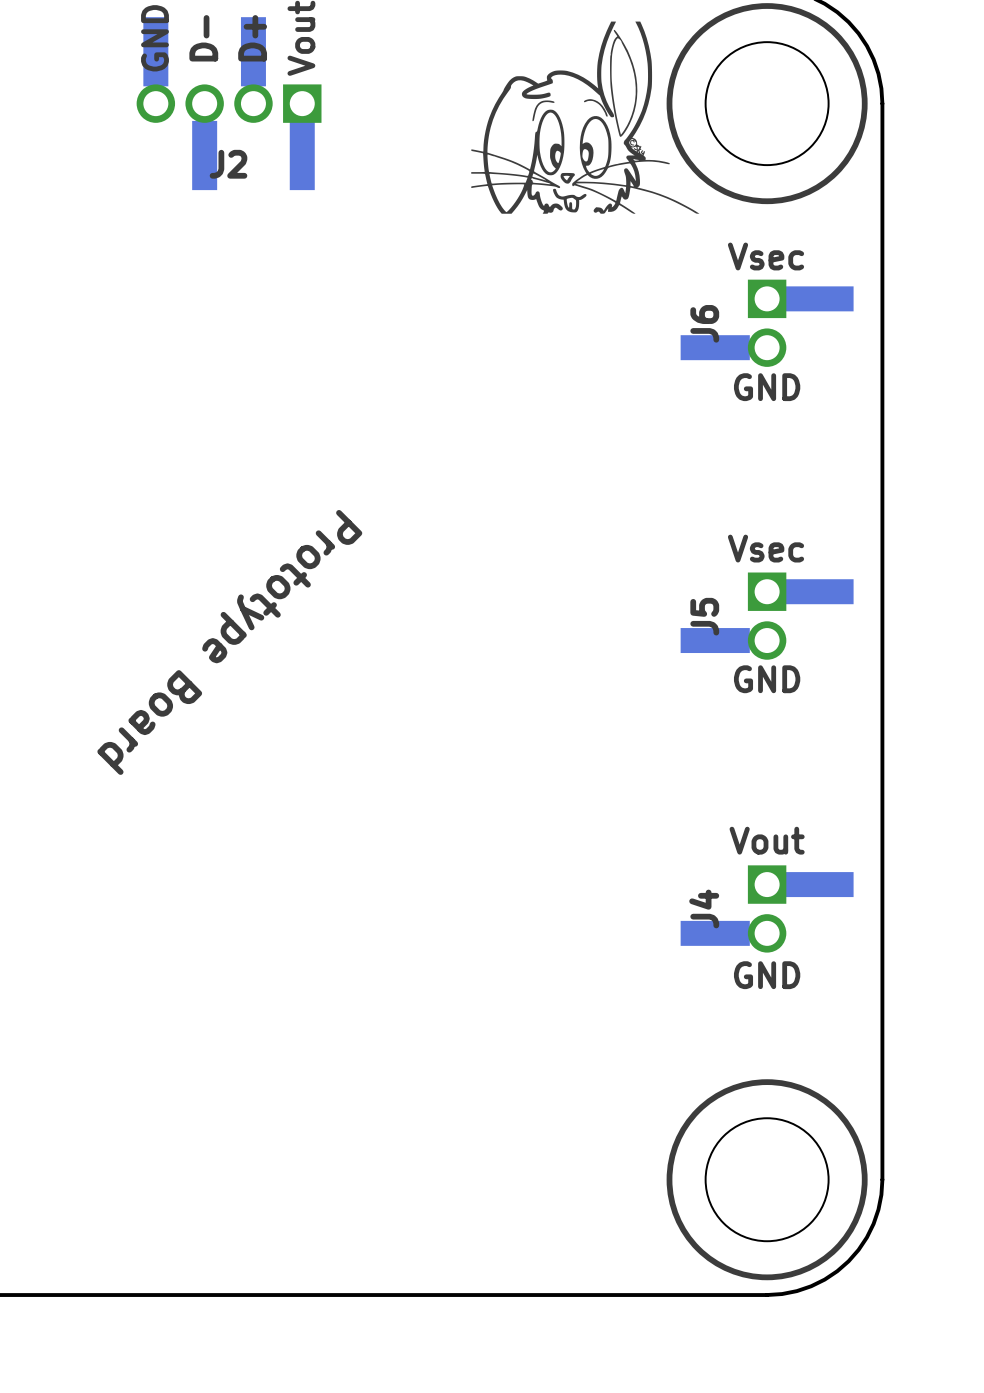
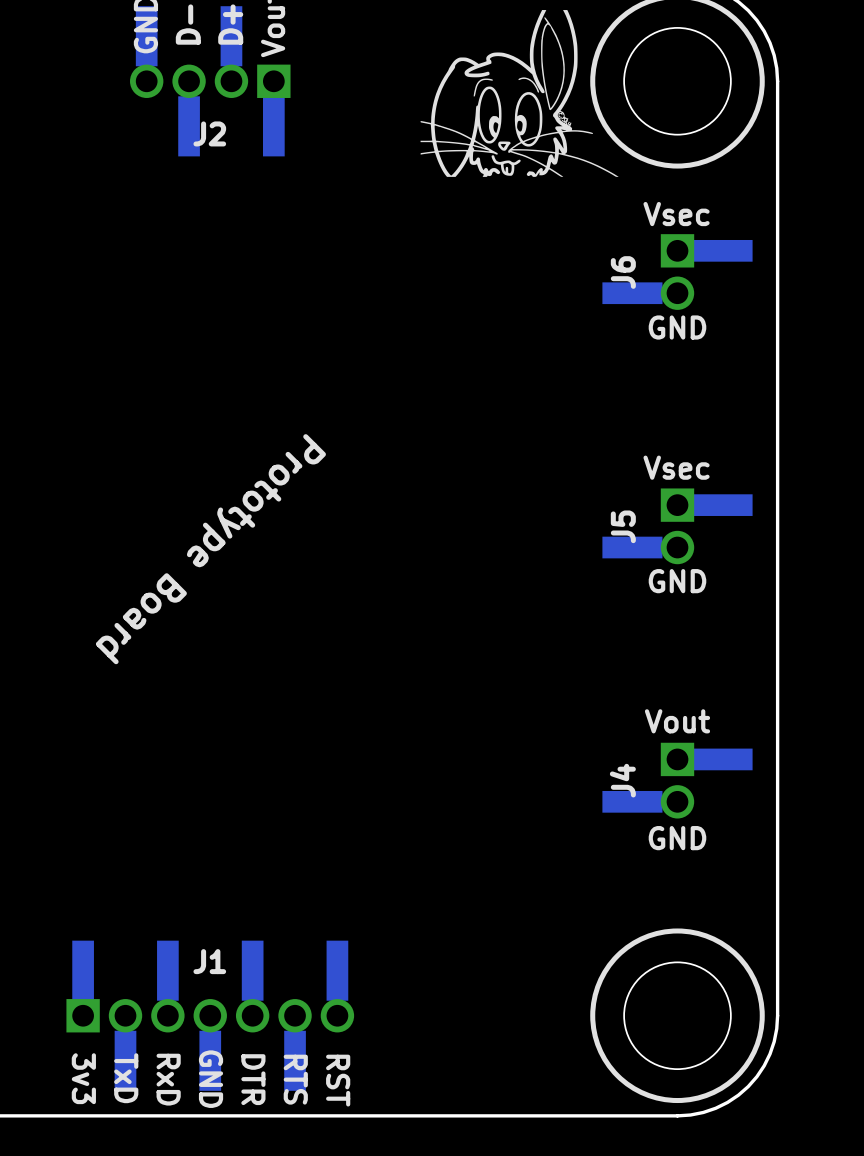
J1: none -> (210, 1015)
text: none -> TxD (126, 1078)
text: none -> 3v3 (83, 1078)
text: none -> GND (211, 1079)
text: none -> RxD (168, 1079)
text: none -> DTR (253, 1079)
text: none -> RTS (295, 1079)
text: none -> RST (338, 1080)

